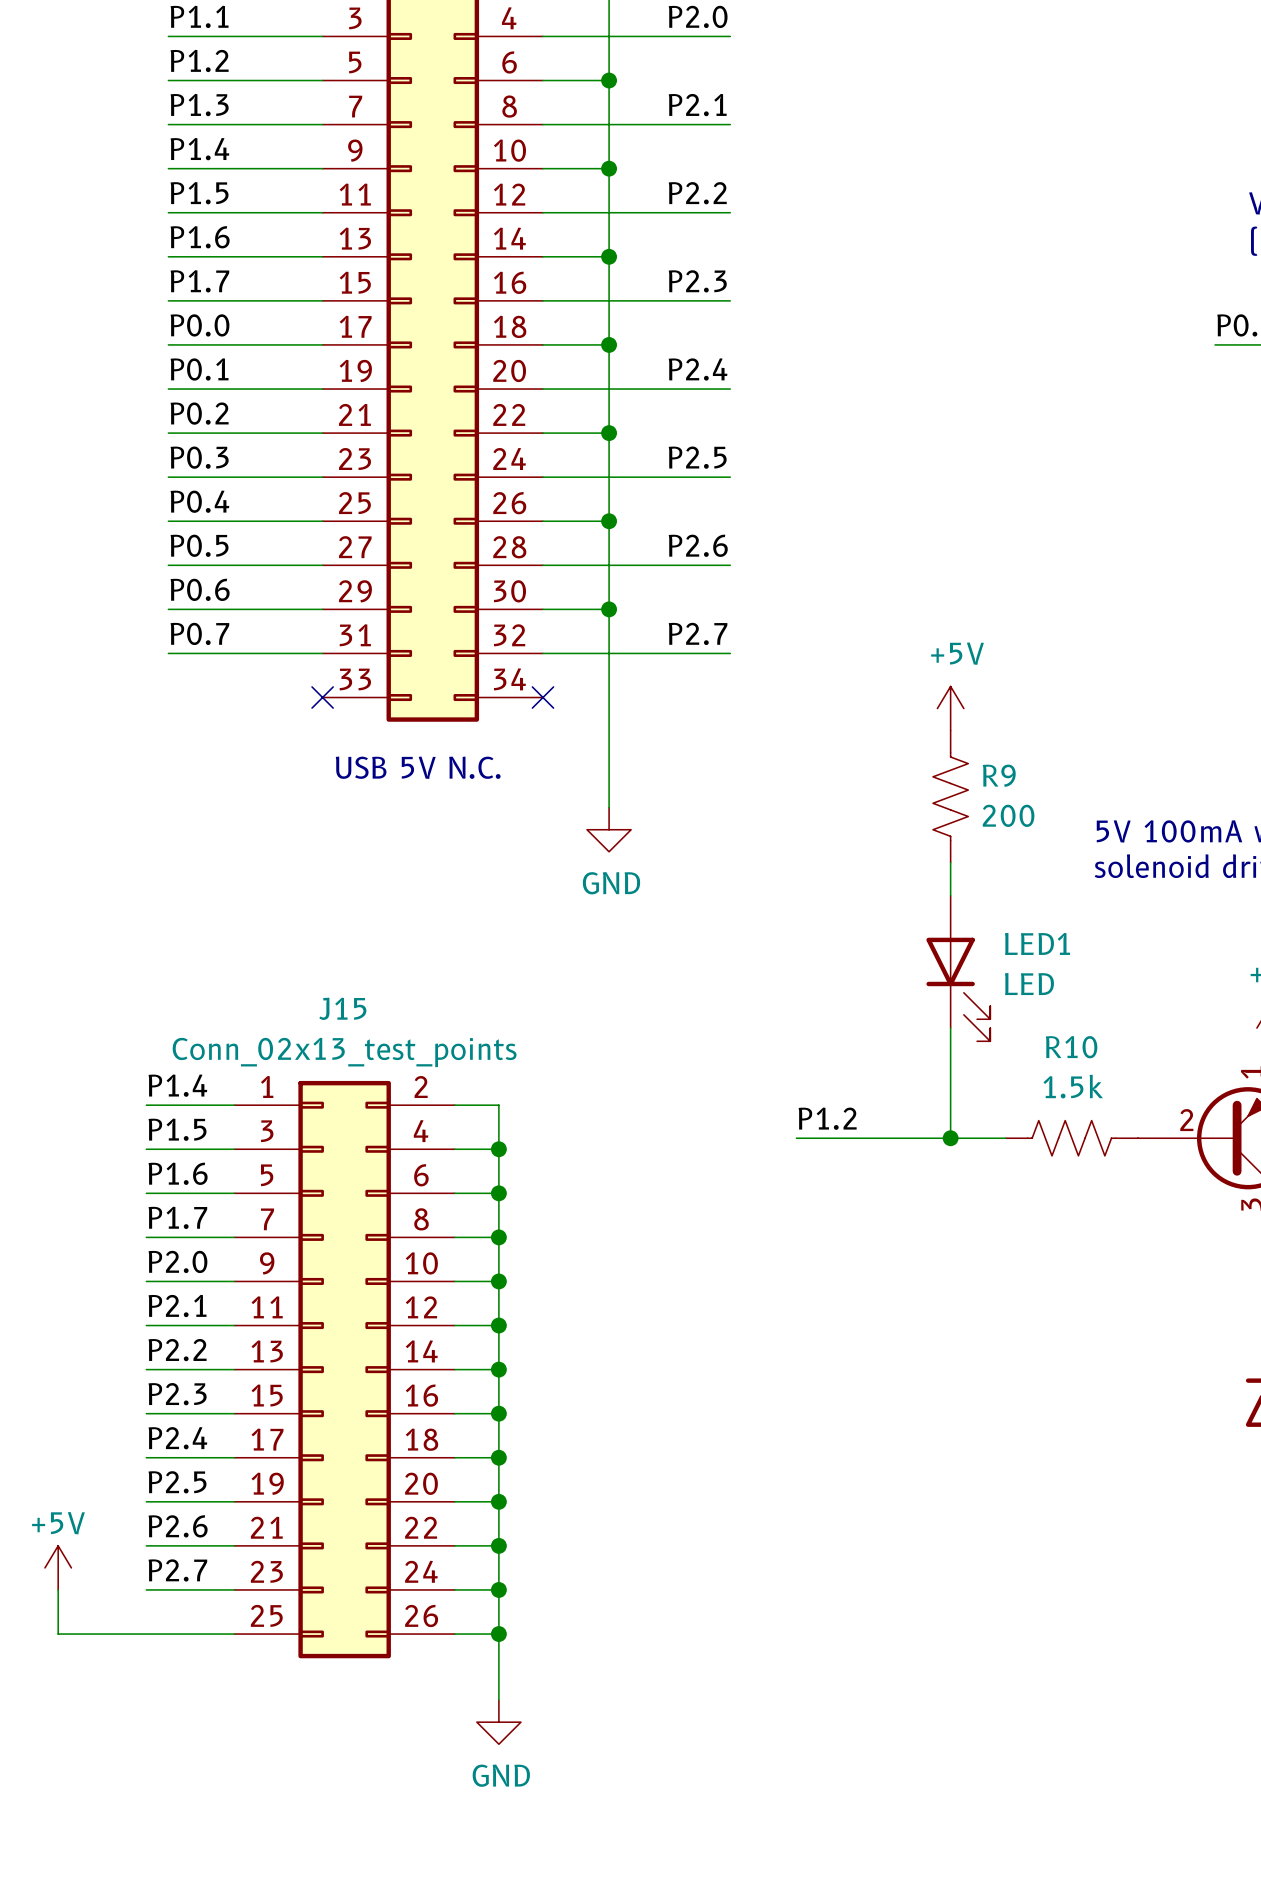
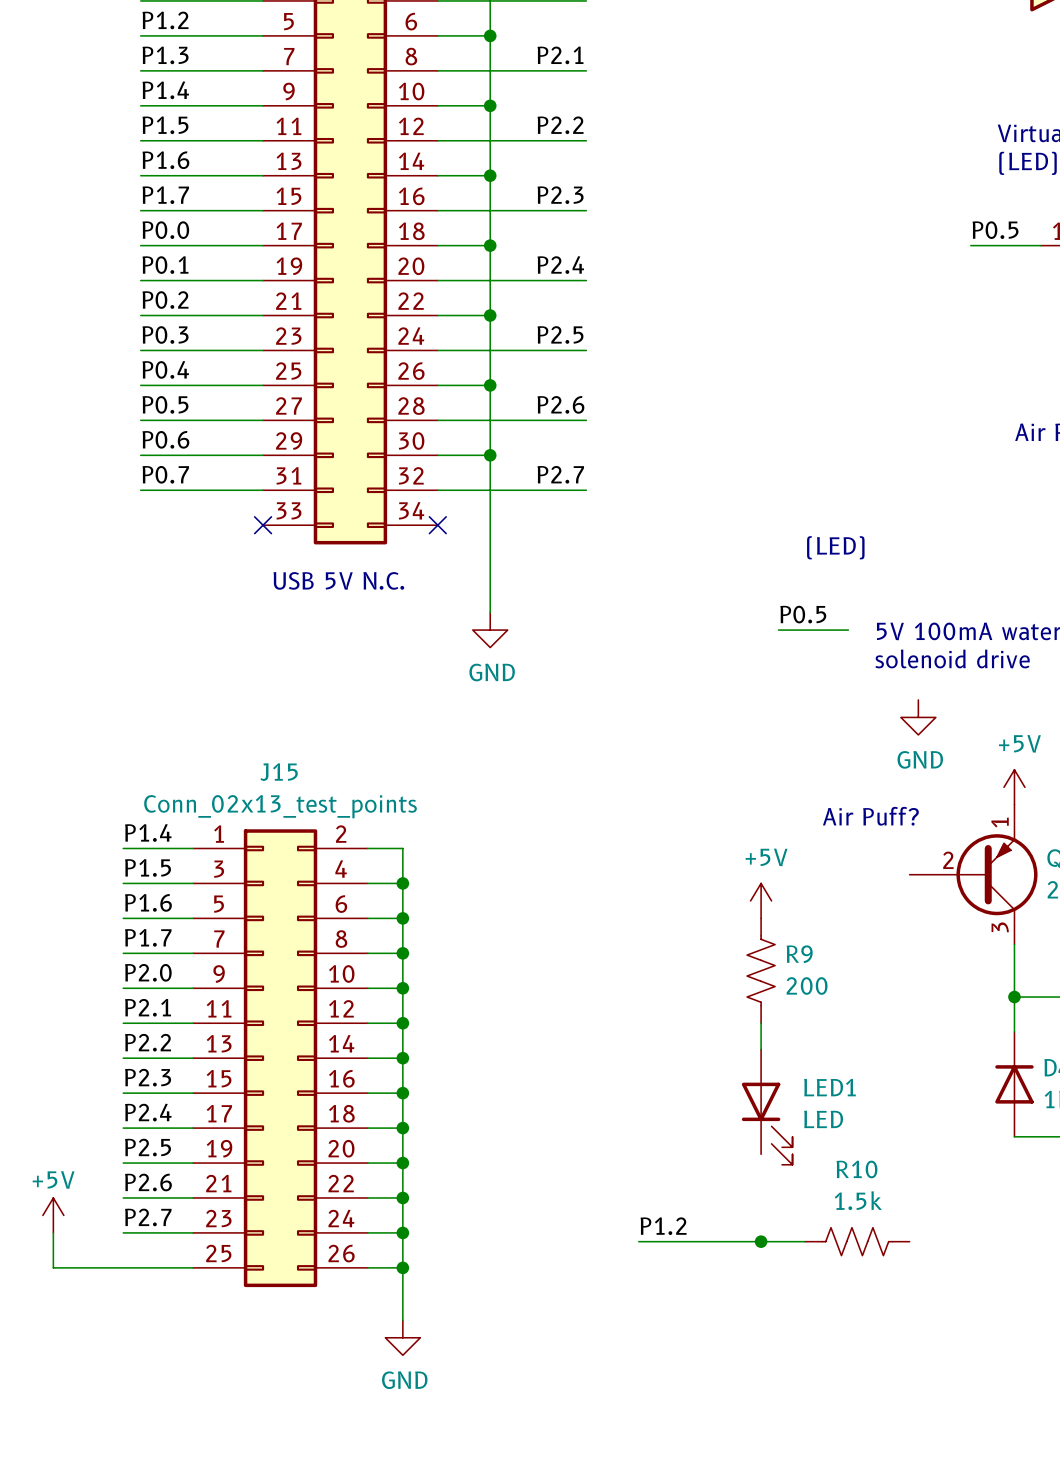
power symbol: +5V (950, 708) -> none
text: none -> (LED) (835, 547)
R9 position: (950, 796) -> (761, 970)
label: none -> P0.5 (803, 614)
wire: none -> (778, 630) (848, 630)
wire: (950, 862) (950, 895) -> none
power symbol: none -> GND (918, 717)
LED1 position: (958, 968) -> (767, 1107)
wire: (950, 1028) (950, 1138) -> none
text: none -> Air Puff? (870, 816)
label: P1.2 (827, 1118) -> none
wire: (796, 1138) (1005, 1138) -> none
junction: (950, 1138) -> none
R10 position: (1071, 1138) -> (857, 1241)
power symbol: none -> +5V (761, 900)
wire: none -> (761, 1023) (761, 1049)
label: none -> P1.2 (663, 1226)
wire: none -> (638, 1241) (804, 1241)
junction: none -> (761, 1241)

